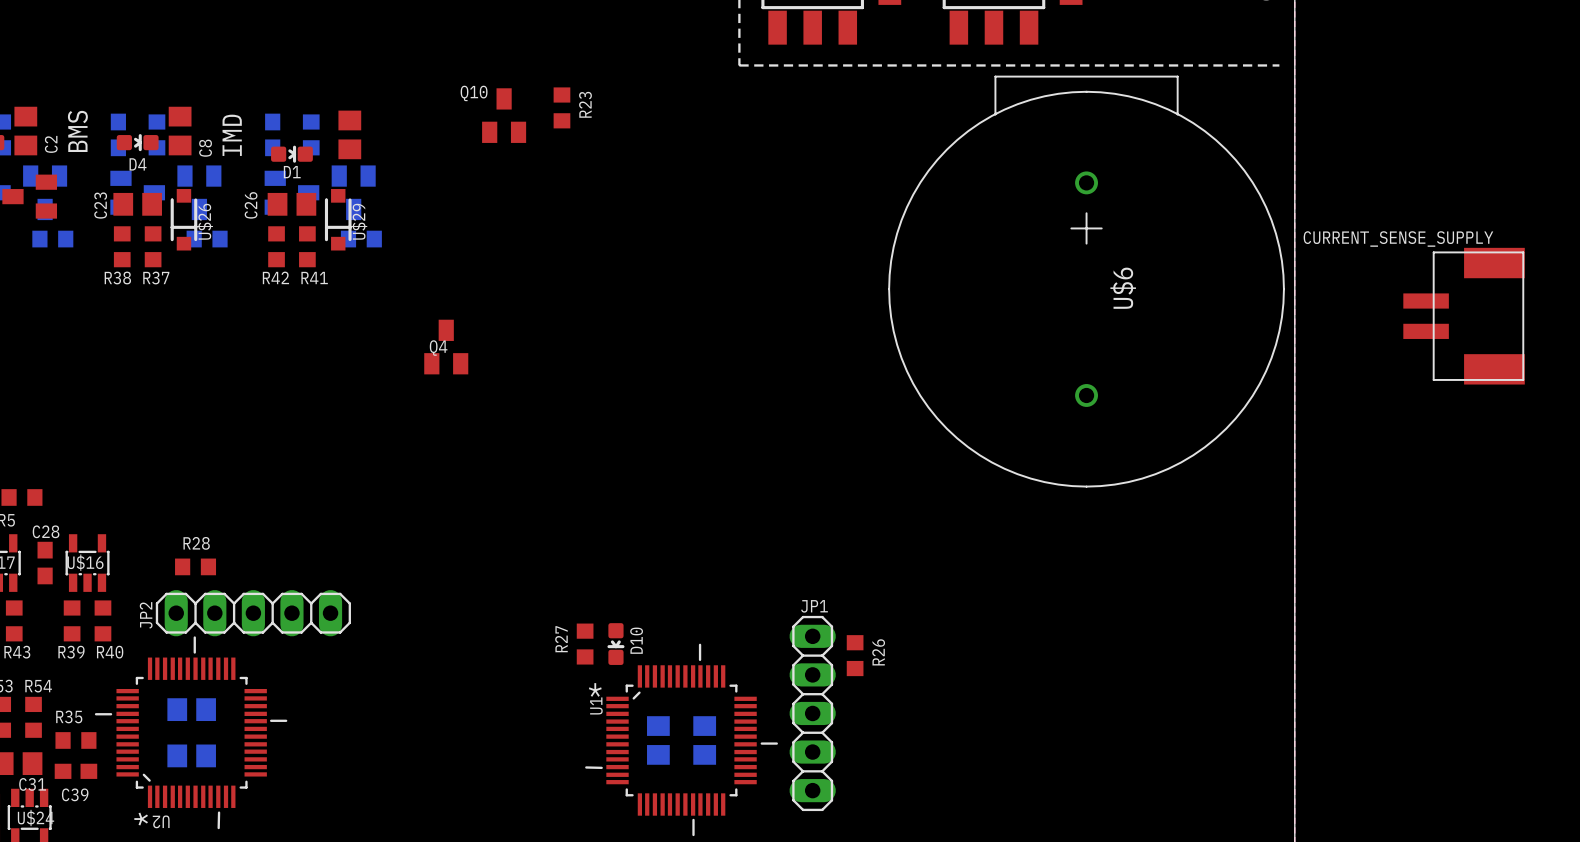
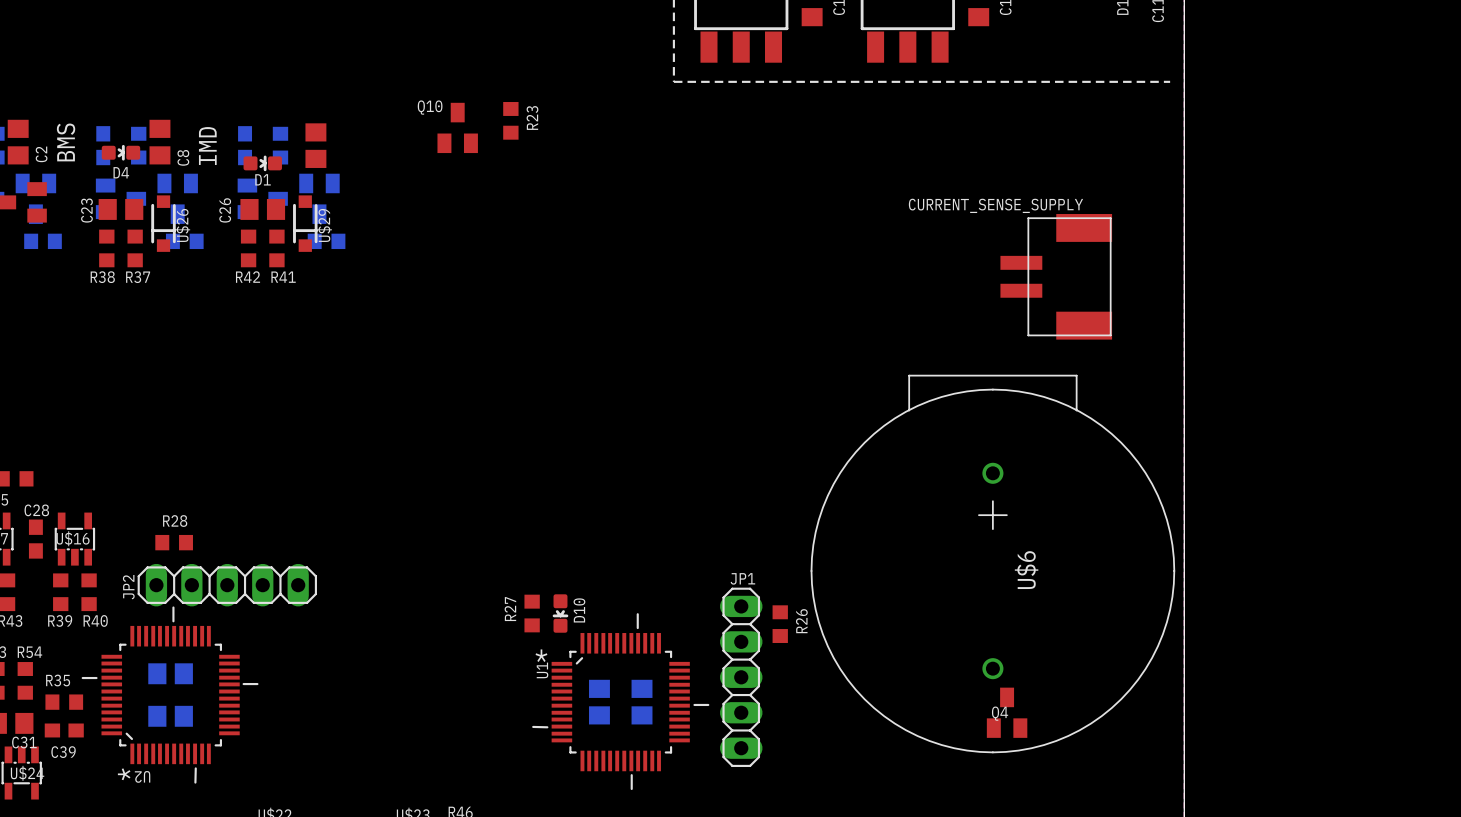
U$6 position: (1086, 281) -> (992, 564)
CURRENT_SENSE_SUPPLY position: (1464, 316) -> (1056, 276)
Q4 position: (446, 347) -> (1007, 712)

